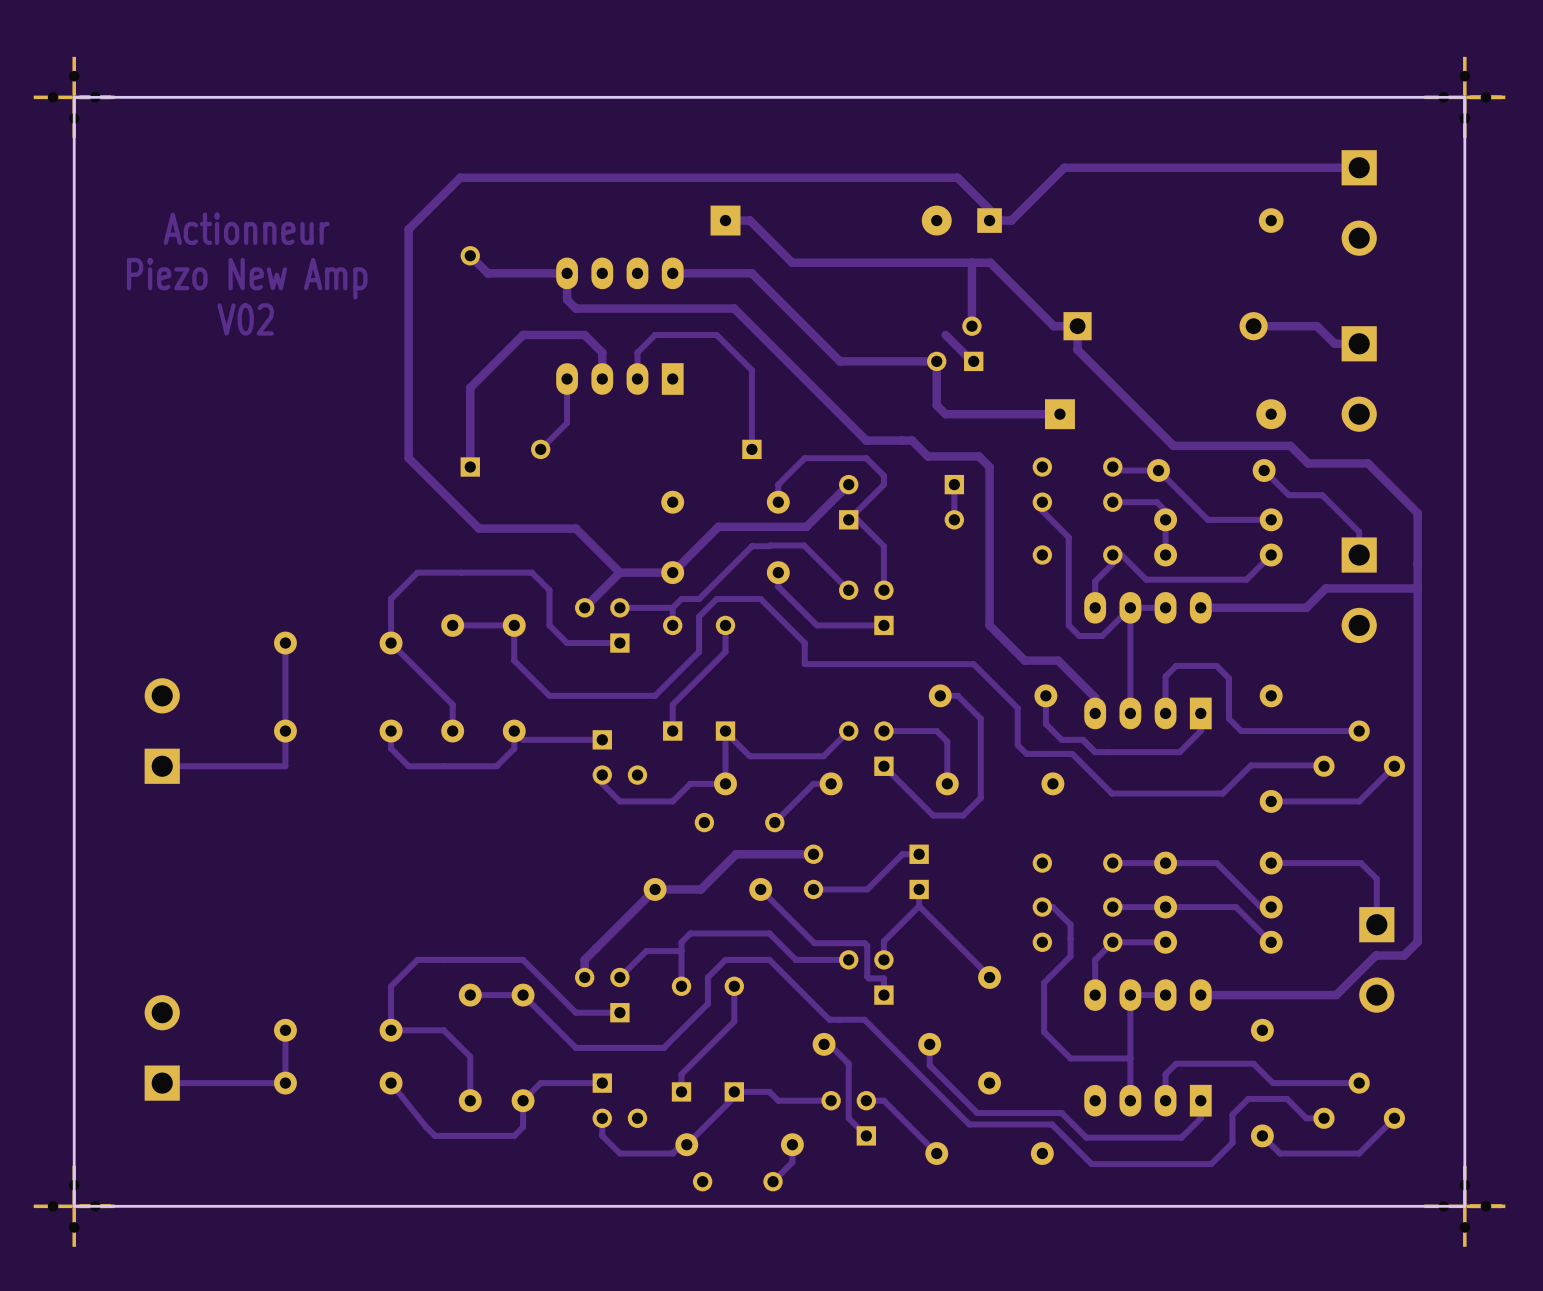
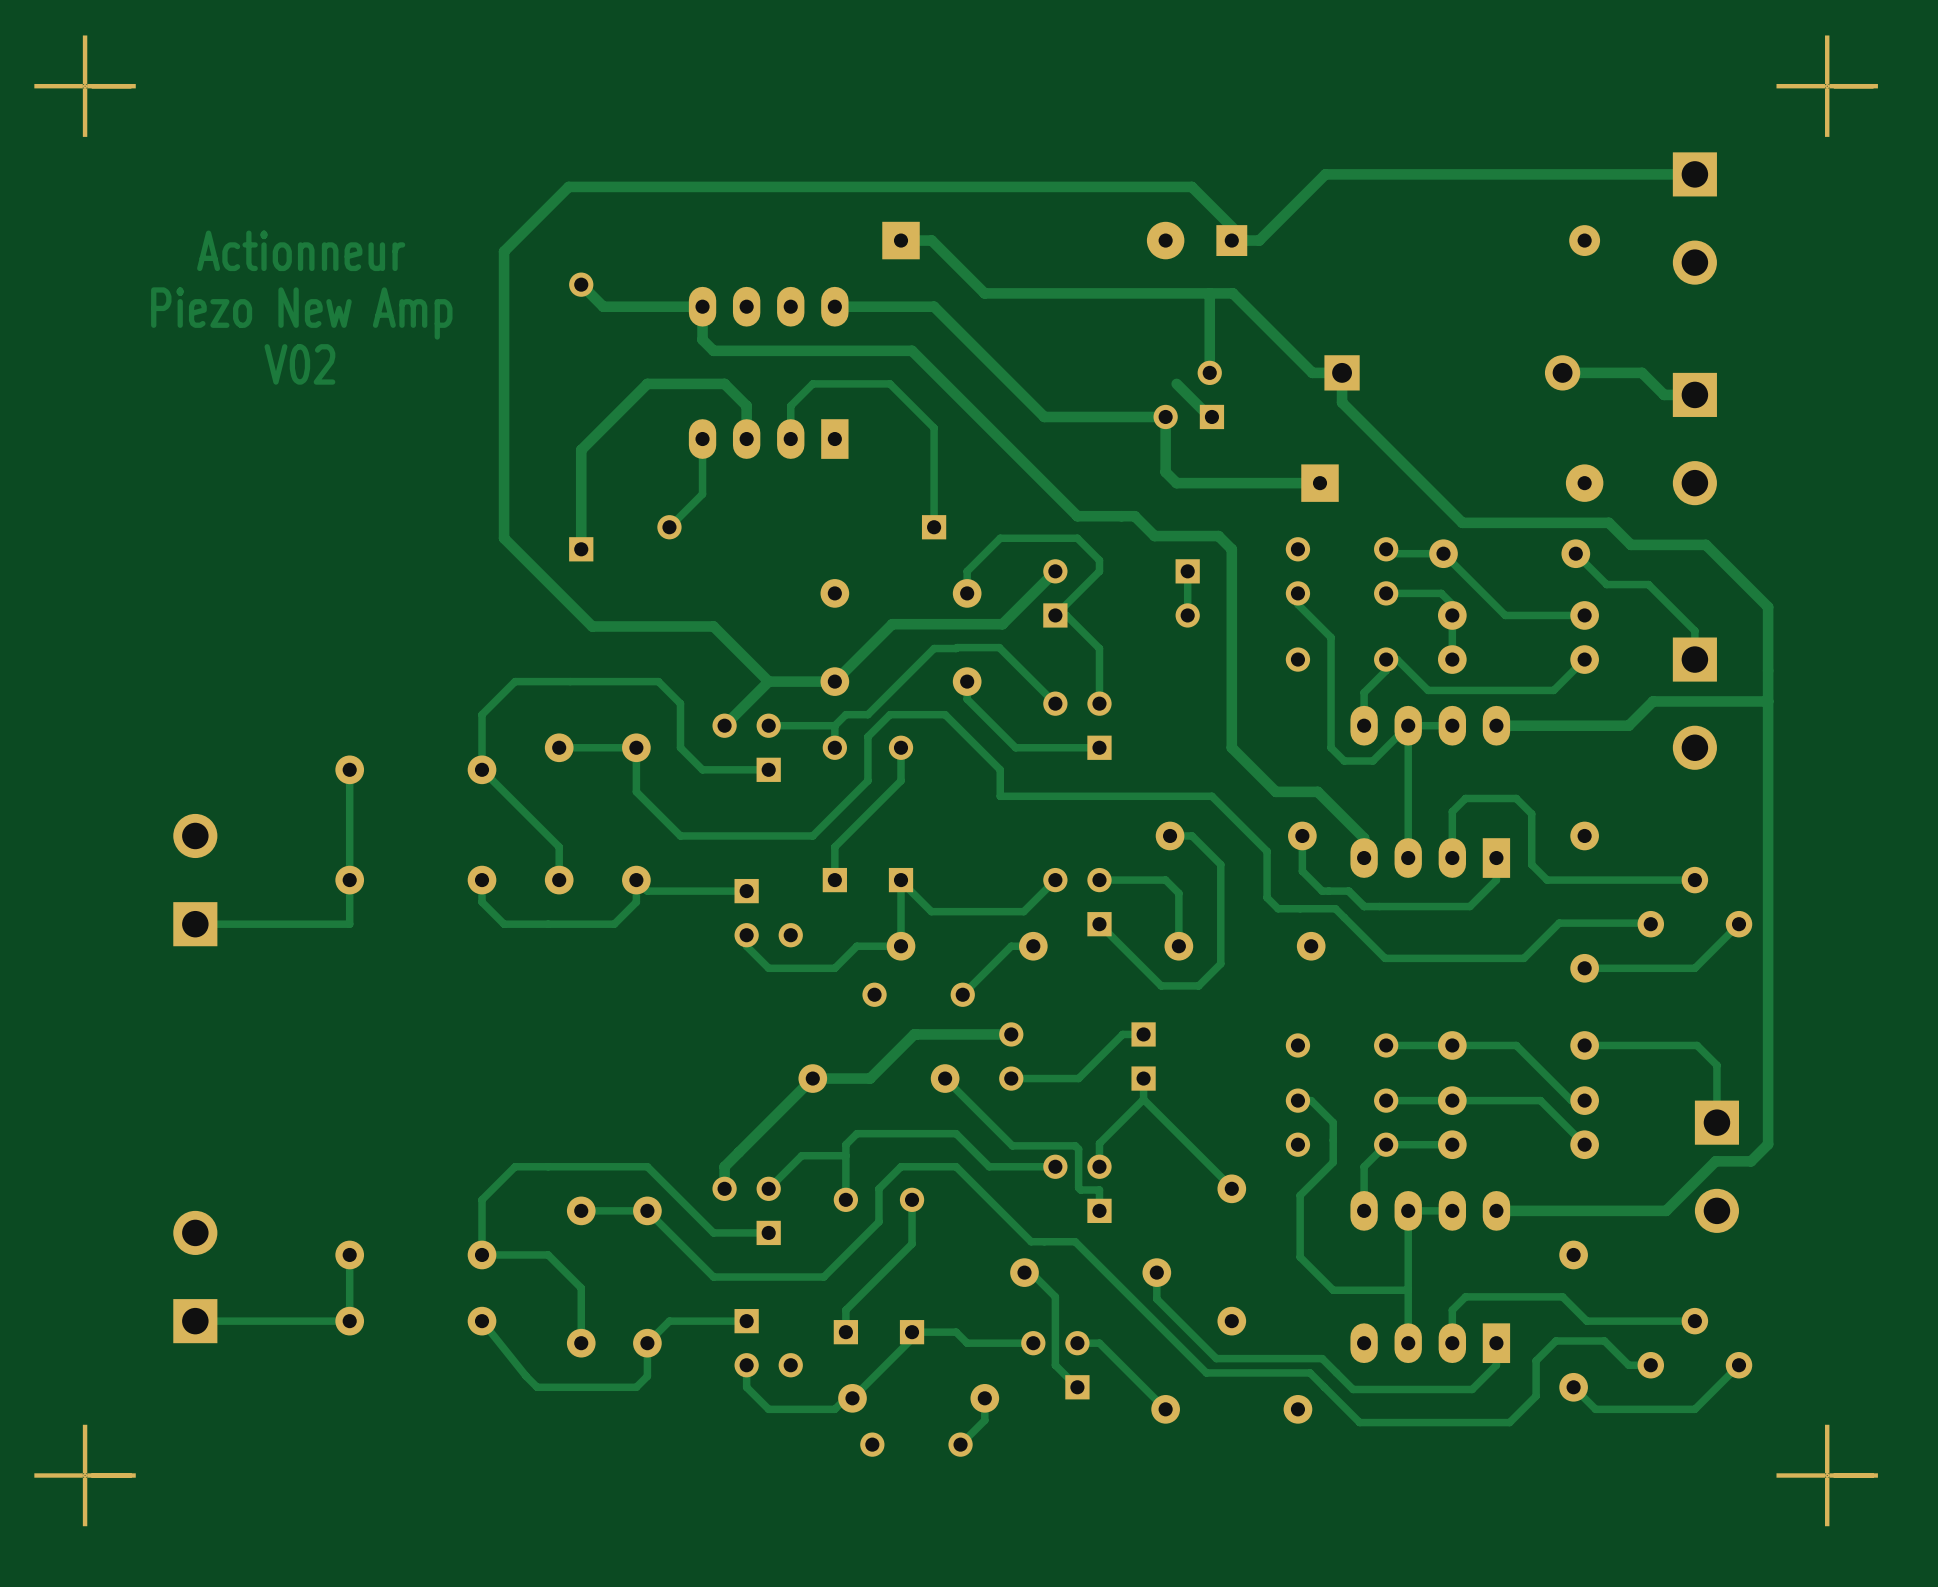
part footprint: [33, 56, 115, 138] -> [34, 35, 136, 137]
part footprint: [1424, 56, 1506, 138] -> [1776, 35, 1878, 137]
board edge: (1464, 97) (1464, 1206) (74, 1206) (74, 97) (1464, 97) -> none
part footprint: [33, 1165, 115, 1247] -> [34, 1424, 136, 1527]
part footprint: [1424, 1165, 1506, 1247] -> [1776, 1424, 1878, 1527]

